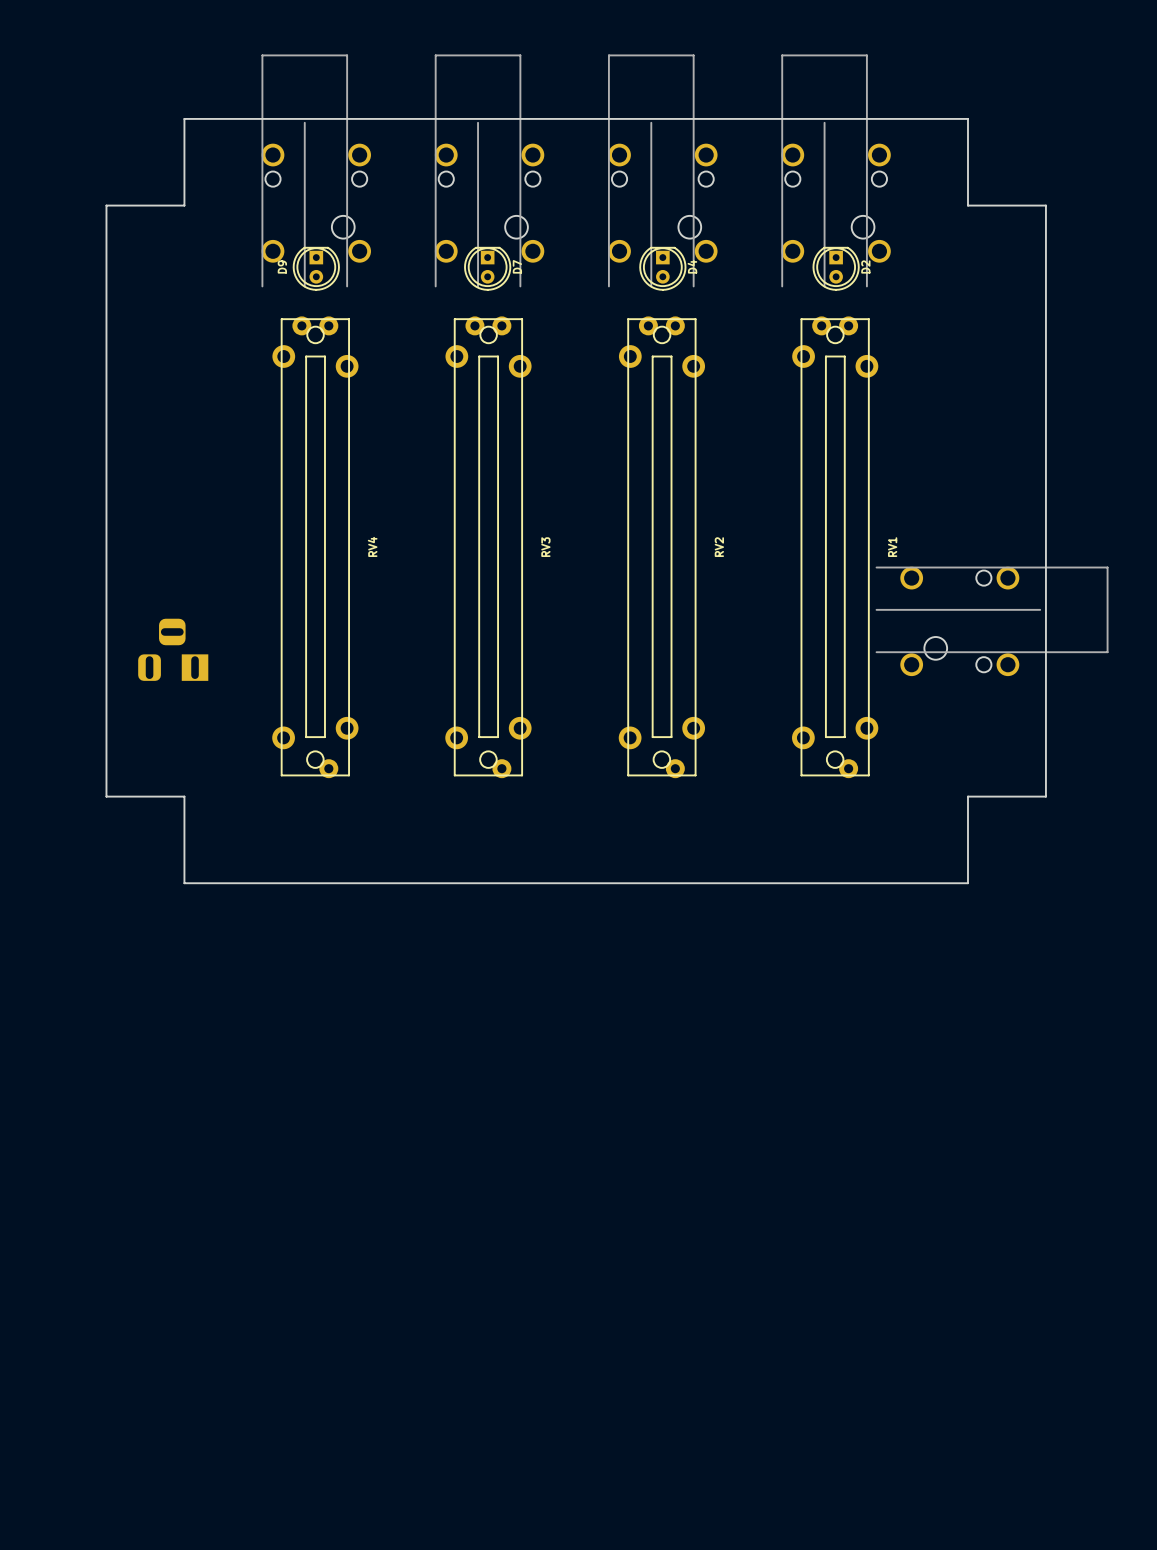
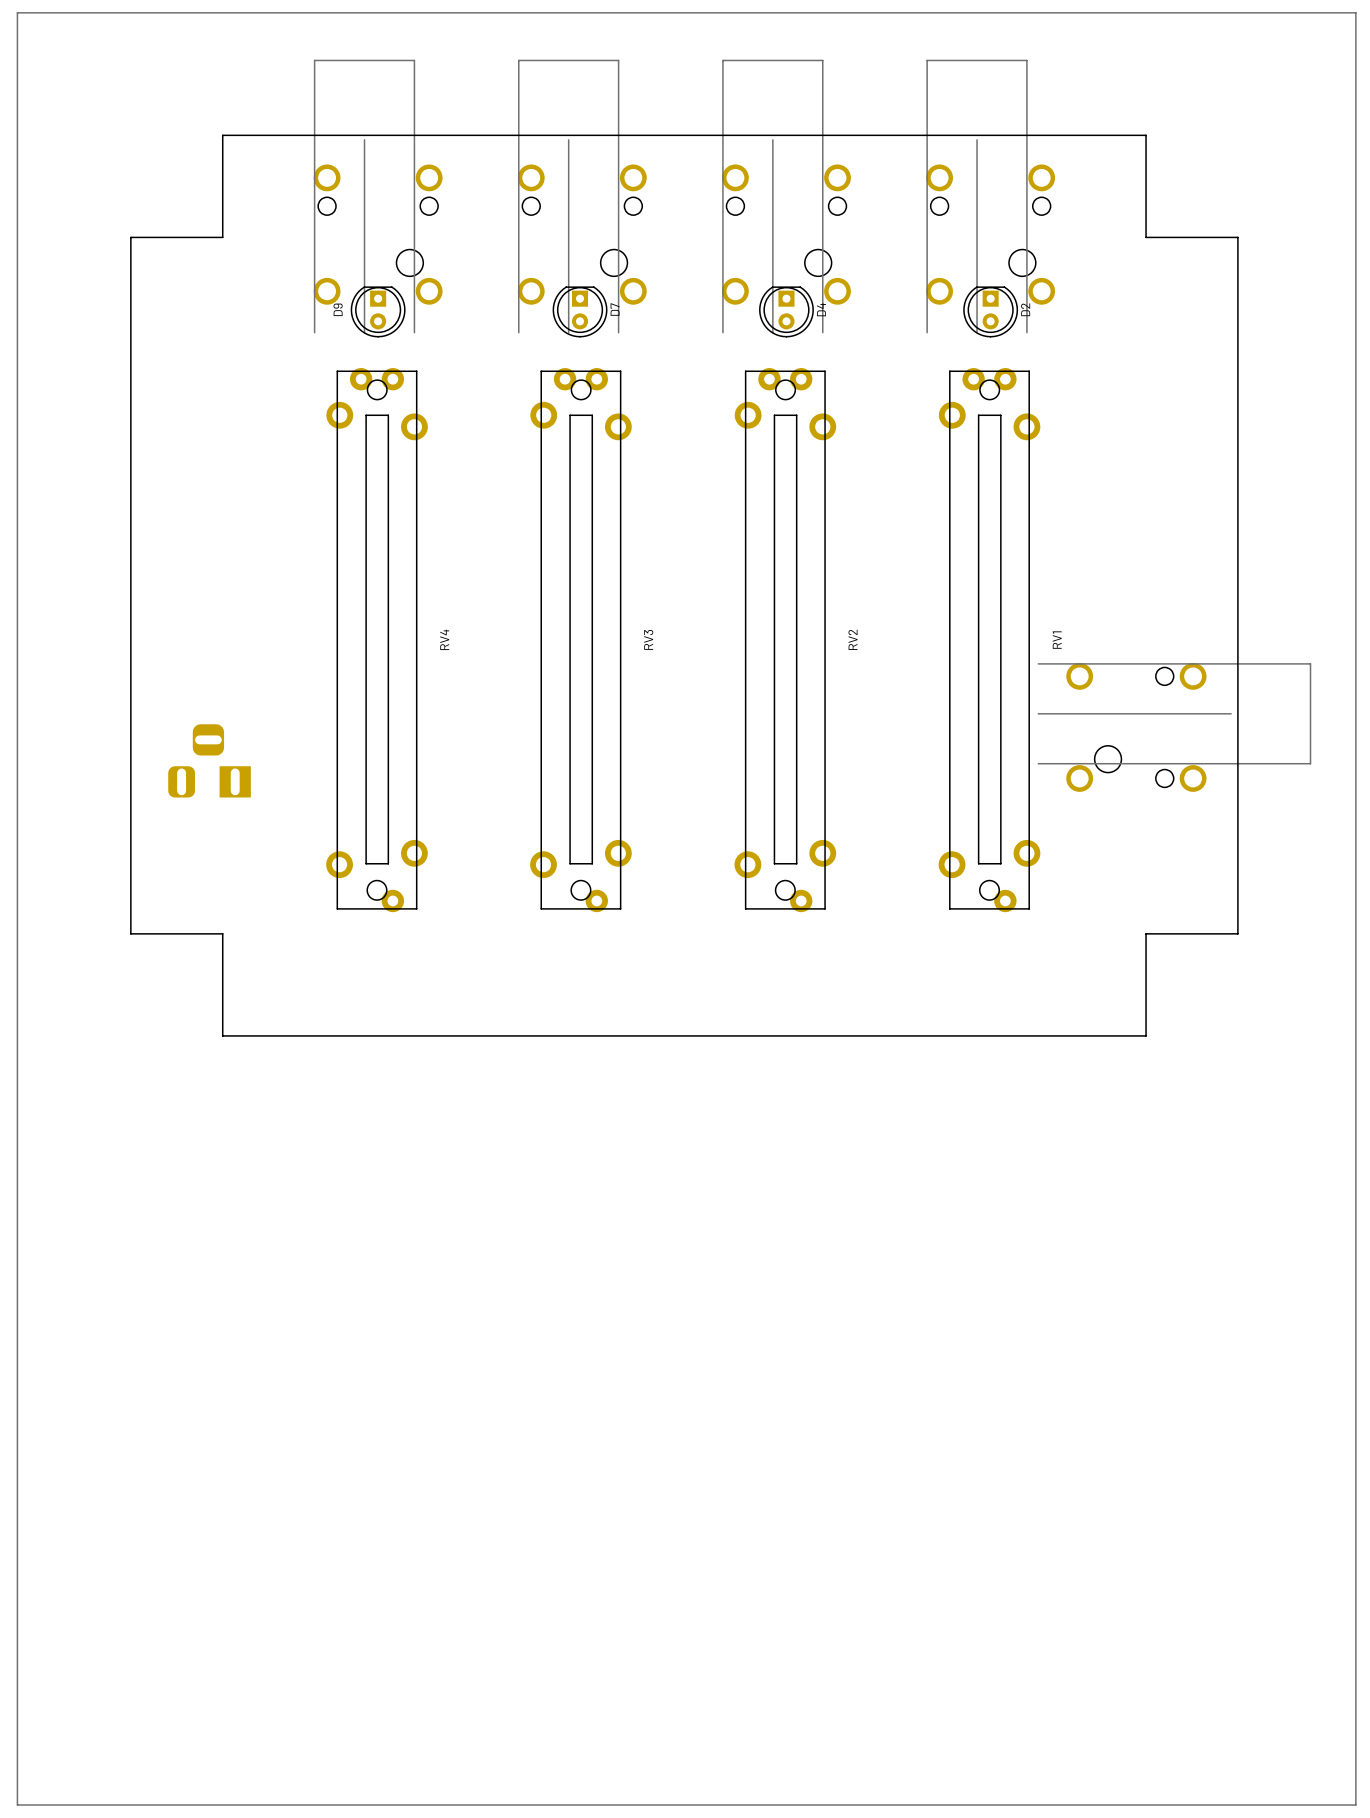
line: none -> (17, 12) (1355, 12) (1355, 1804) (17, 1804) (17, 12)

